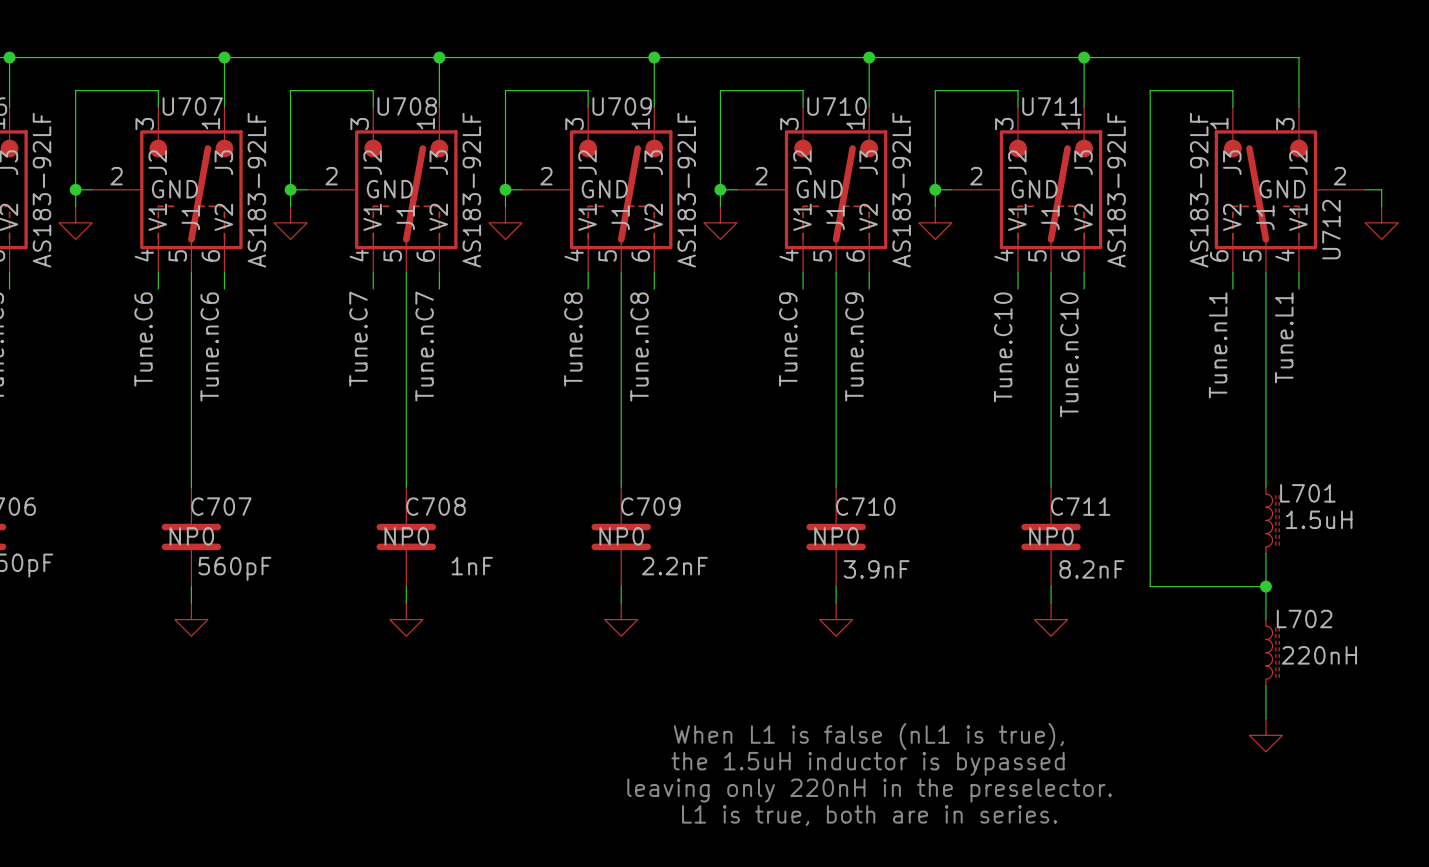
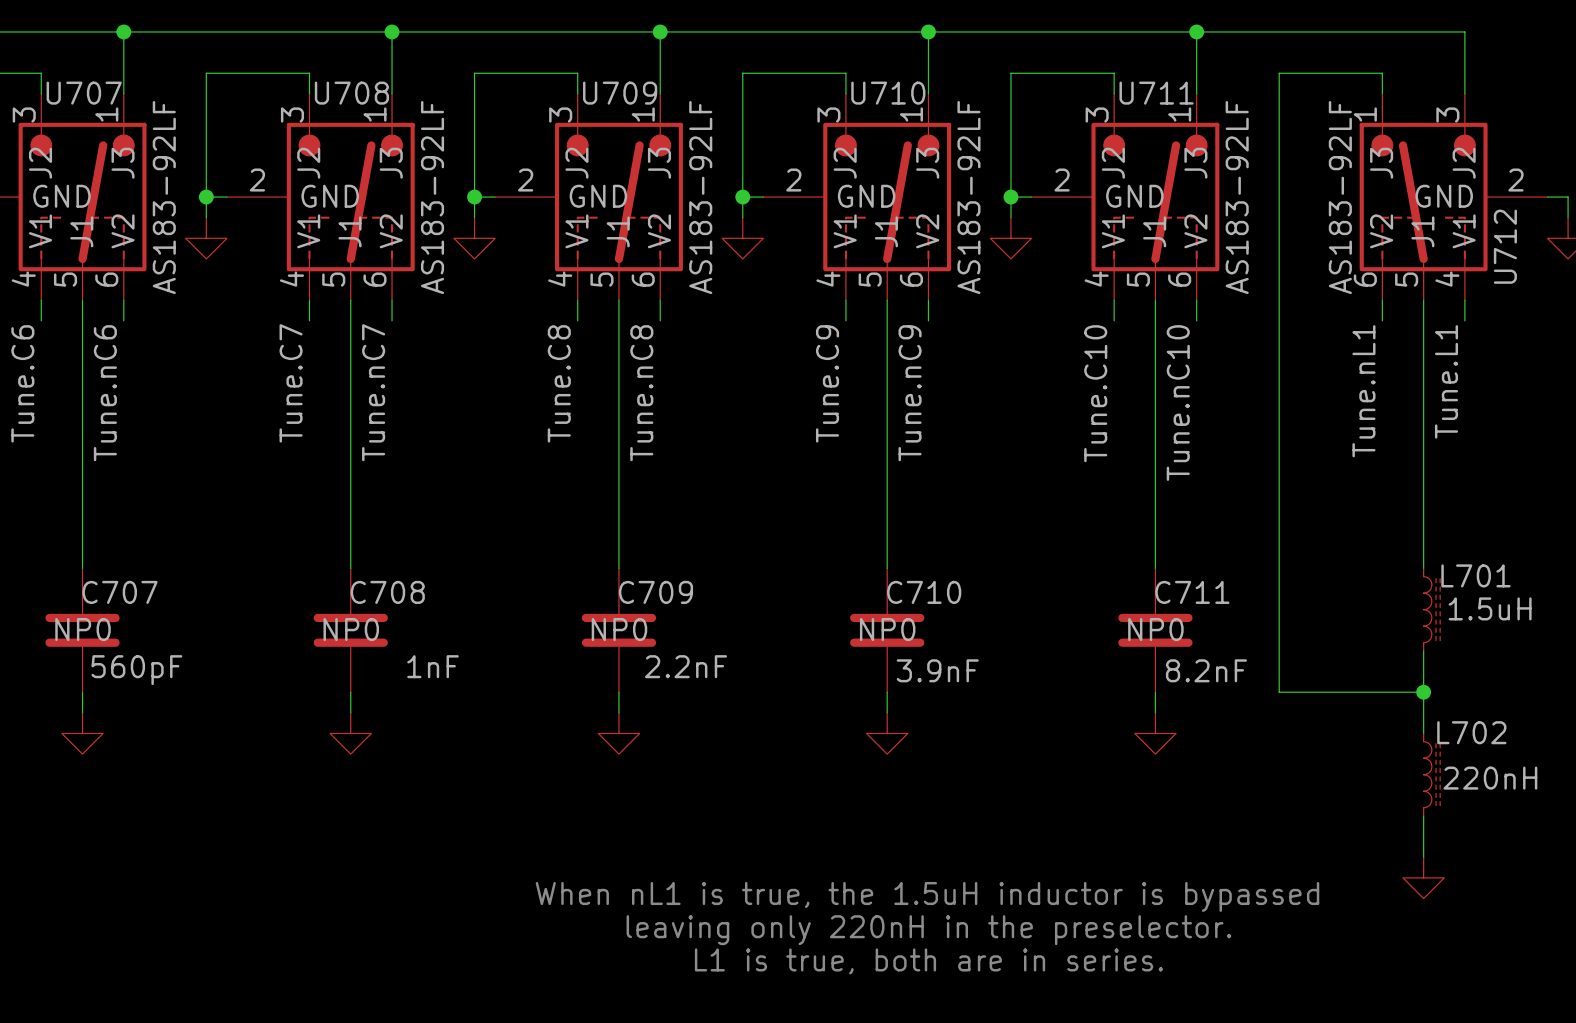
text: When L1 is false (nL1 is true), (868, 736) -> none
text: the 1.5uH inductor is bypassed (868, 763) -> When nL1 is true, the 1.5uH inductor is bypassed (927, 896)
text position: leaving only 220nH in the preselector. (869, 790) -> leaving only 220nH in the preselector. (928, 930)
text position: L1 is true, both are in series. (869, 815) -> L1 is true, both are in series. (928, 961)

